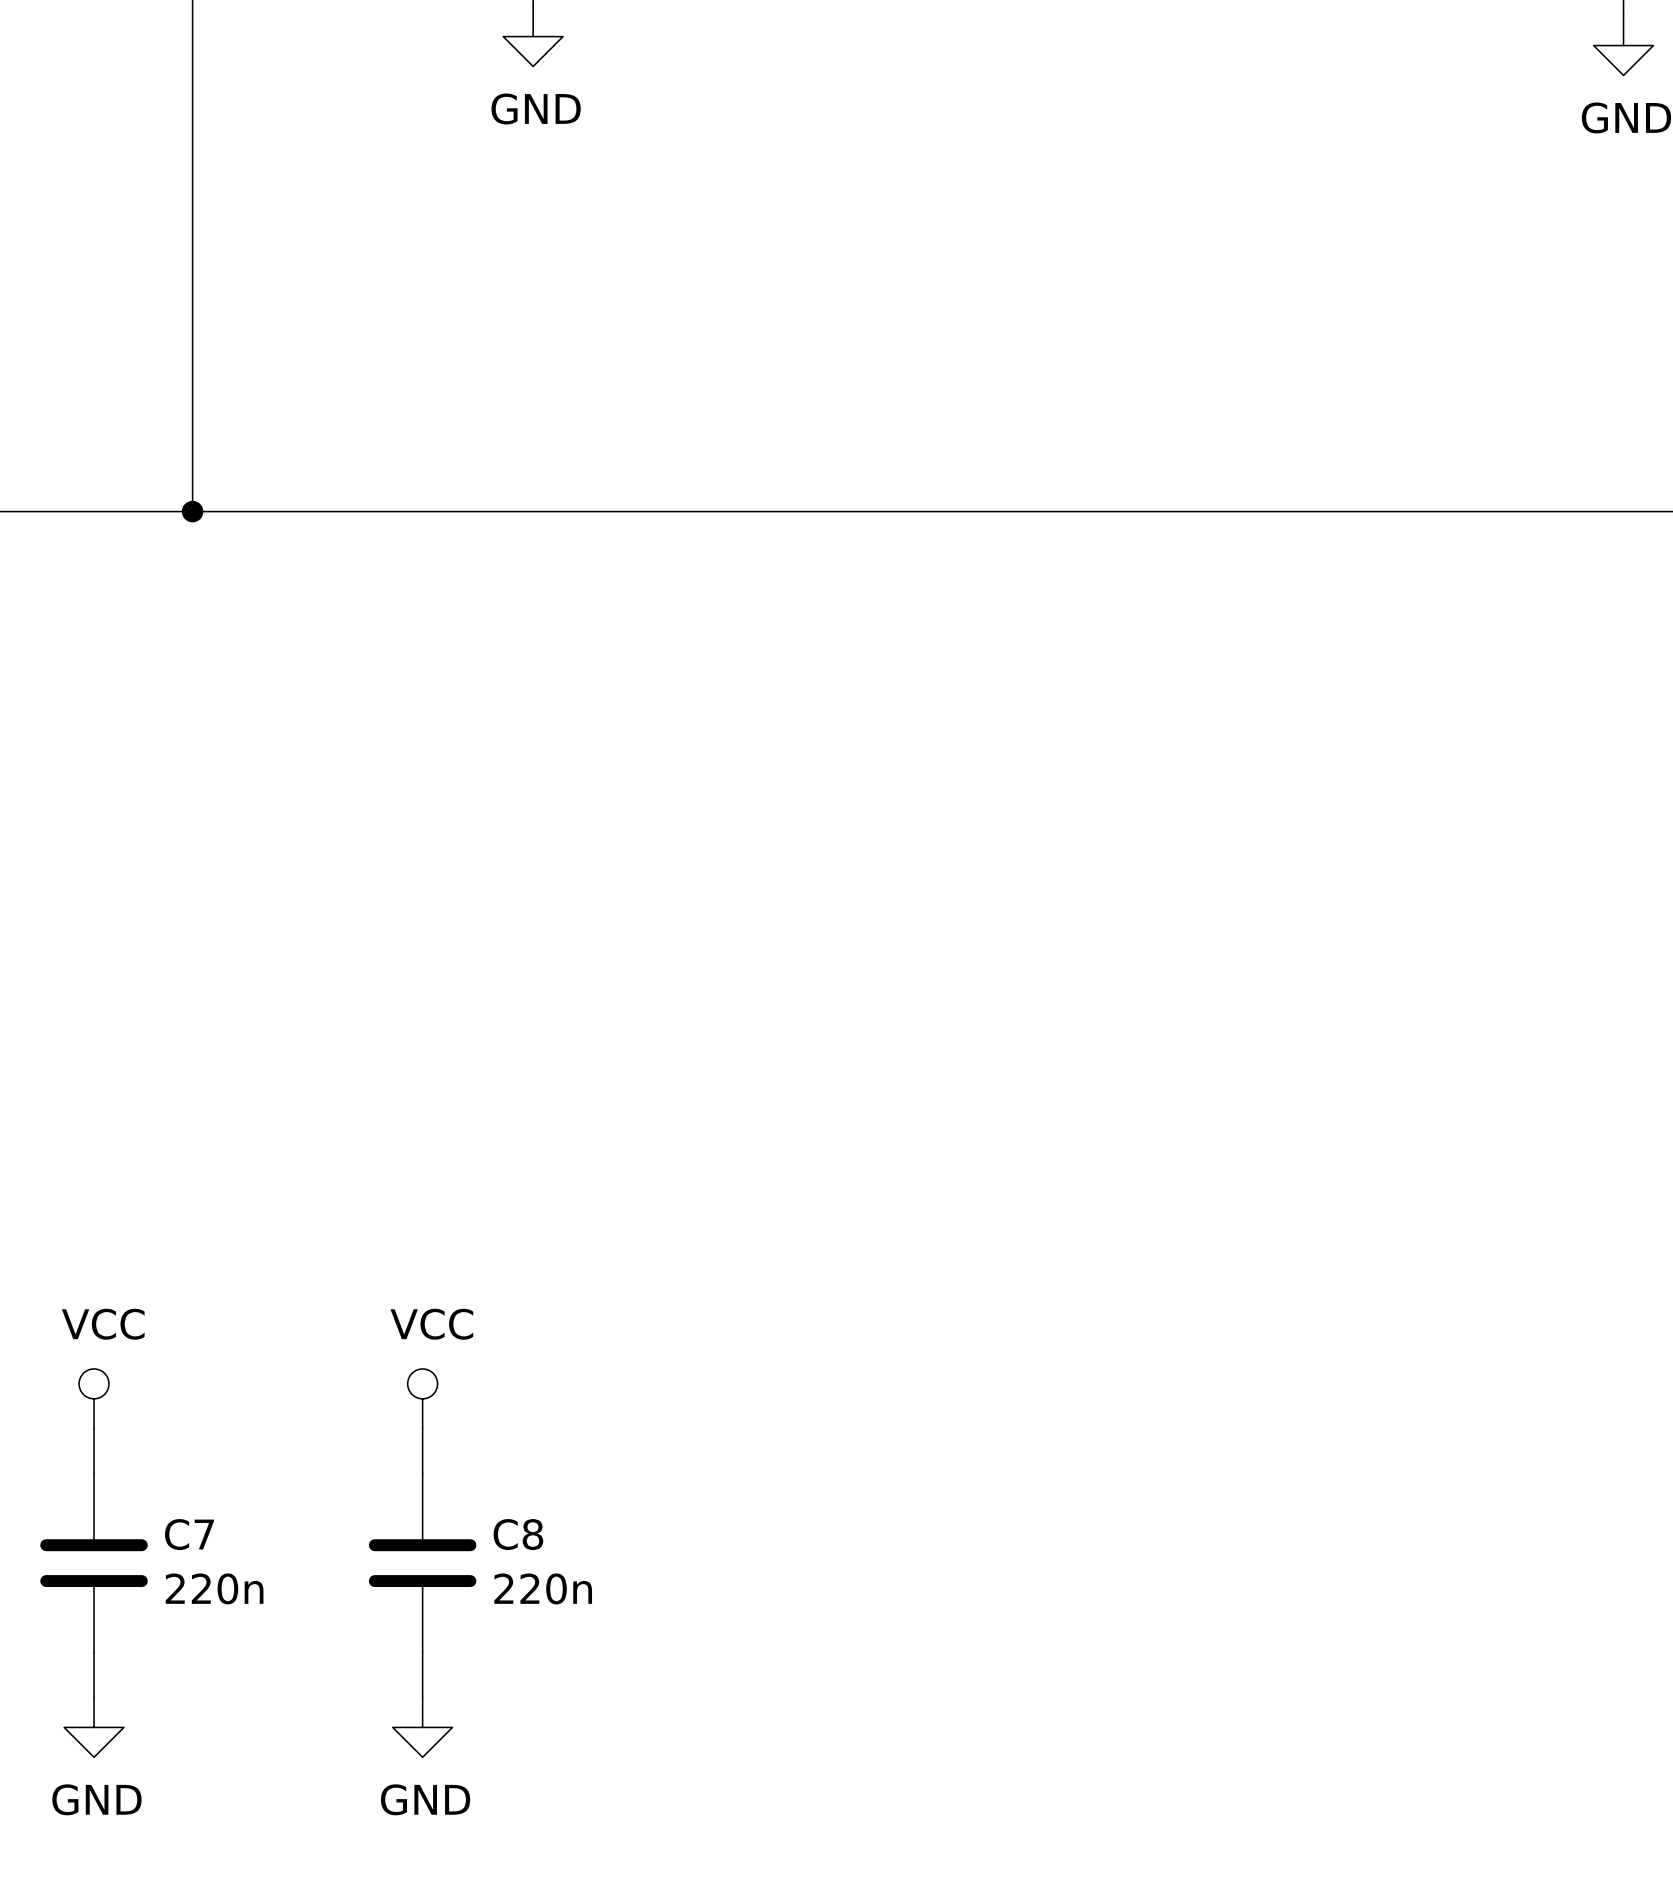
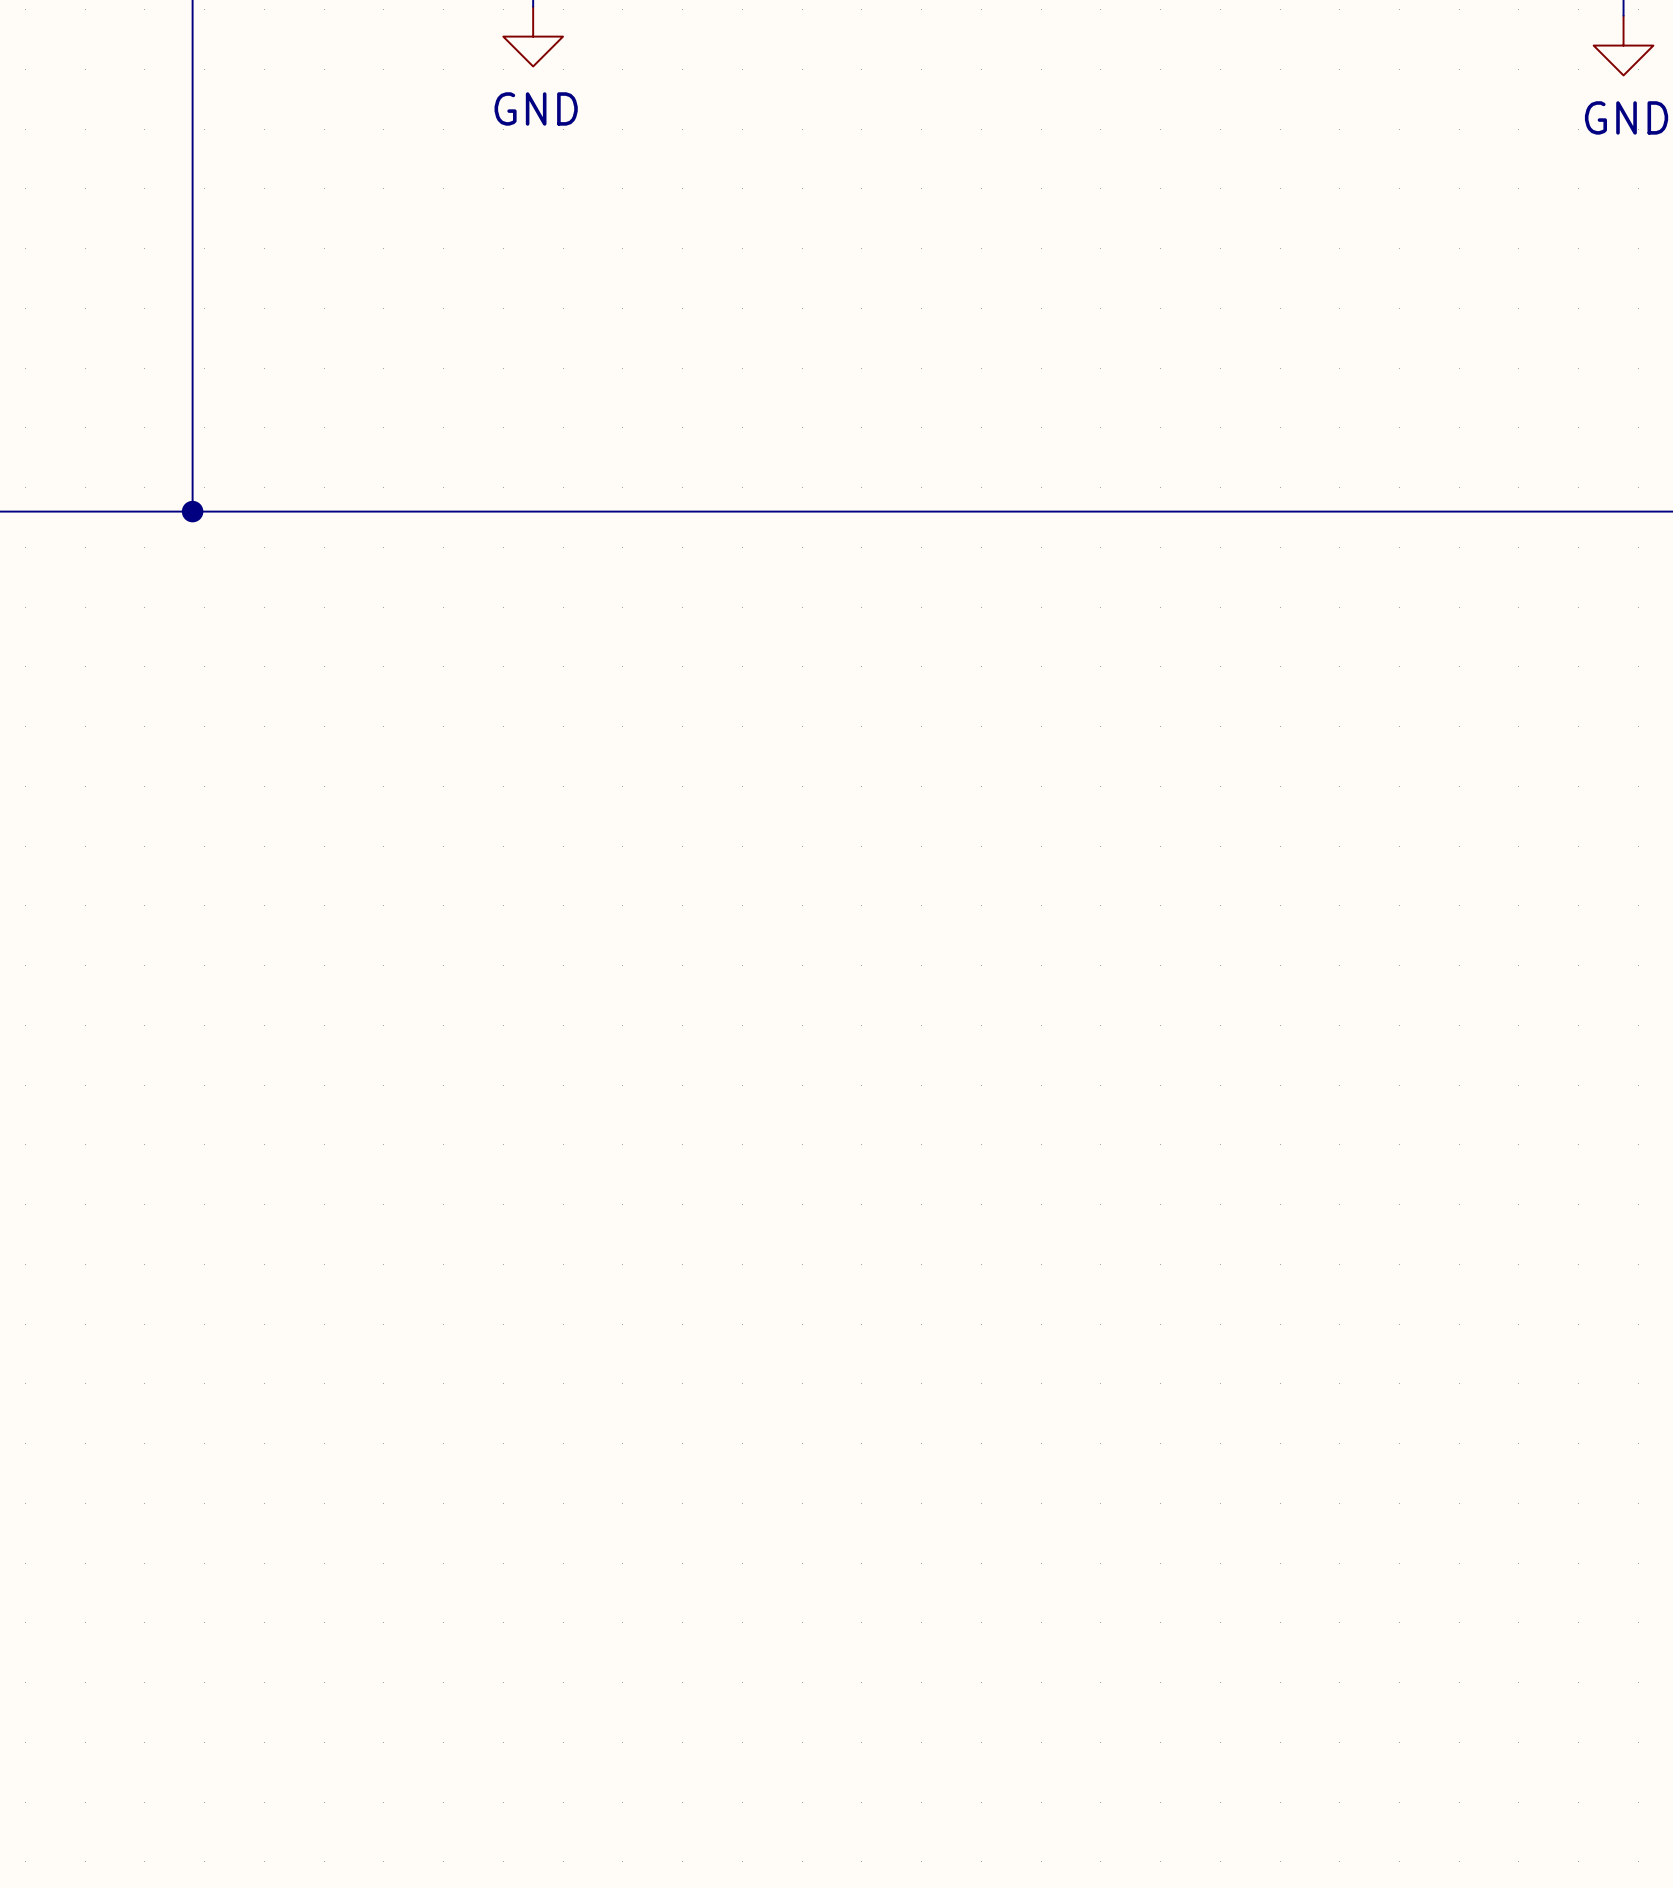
power symbol: VCC (94, 1398) -> none
power symbol: VCC (422, 1398) -> none
wire: (94, 1428) (94, 1473) -> none
wire: (422, 1428) (422, 1473) -> none
C7: 220n (94, 1563) -> none
C8: 220n (422, 1563) -> none
wire: (94, 1652) (94, 1697) -> none
wire: (422, 1652) (422, 1697) -> none
power symbol: GND (94, 1727) -> none
power symbol: GND (422, 1727) -> none

